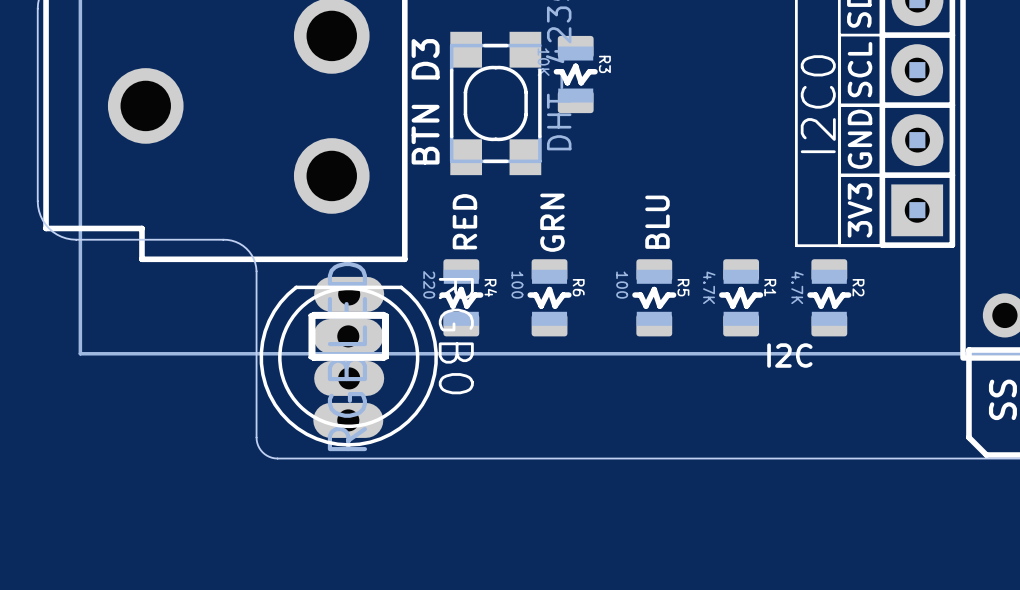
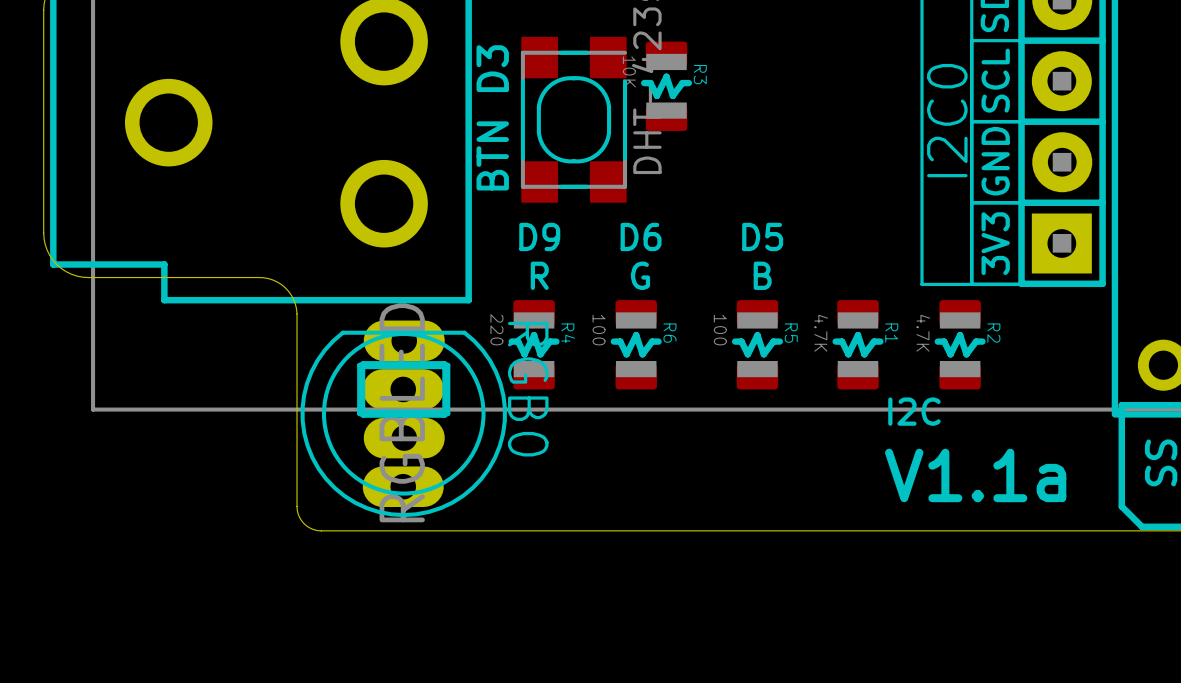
text: none -> D9 (539, 236)
text: none -> D6 (641, 236)
text: none -> D5 (762, 236)
text: RED (464, 221) -> none
text: GRN (552, 222) -> none
text: BLU (657, 222) -> none
text: none -> R (539, 275)
text: none -> G (640, 275)
text: none -> B (762, 275)
text: none -> V1.1a (975, 475)

